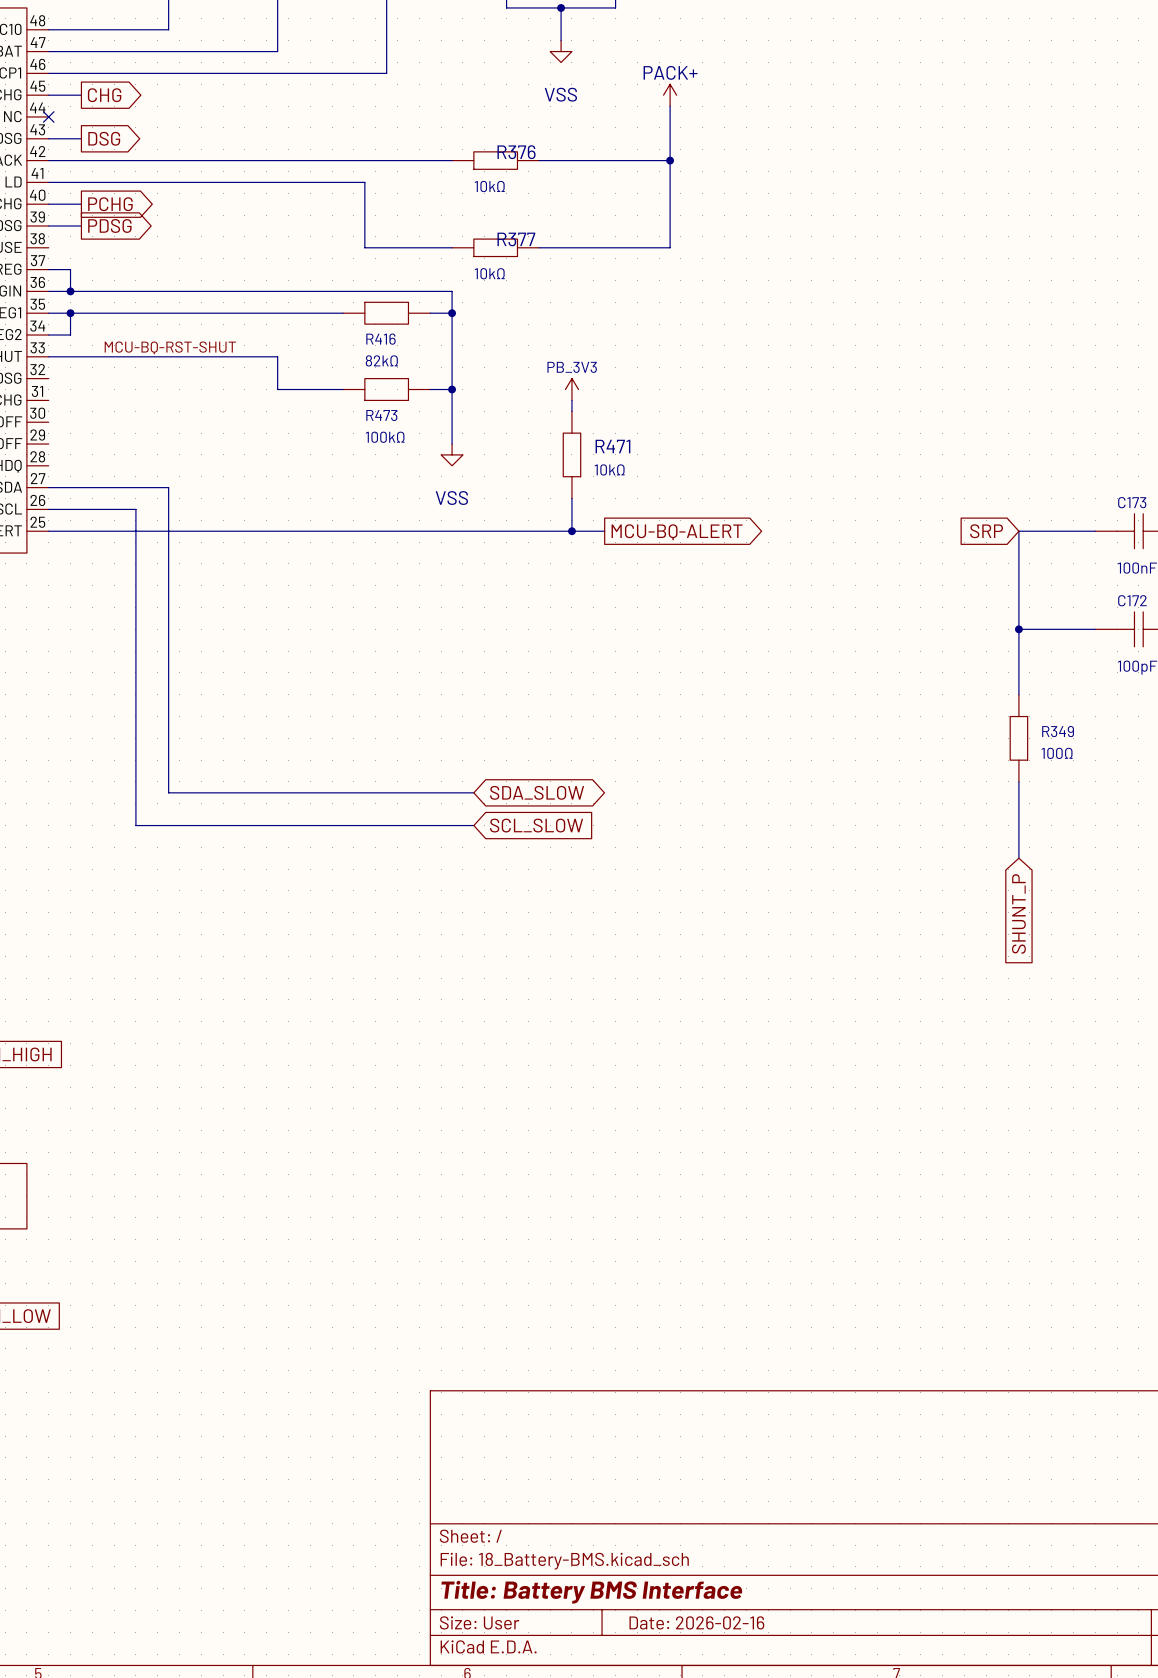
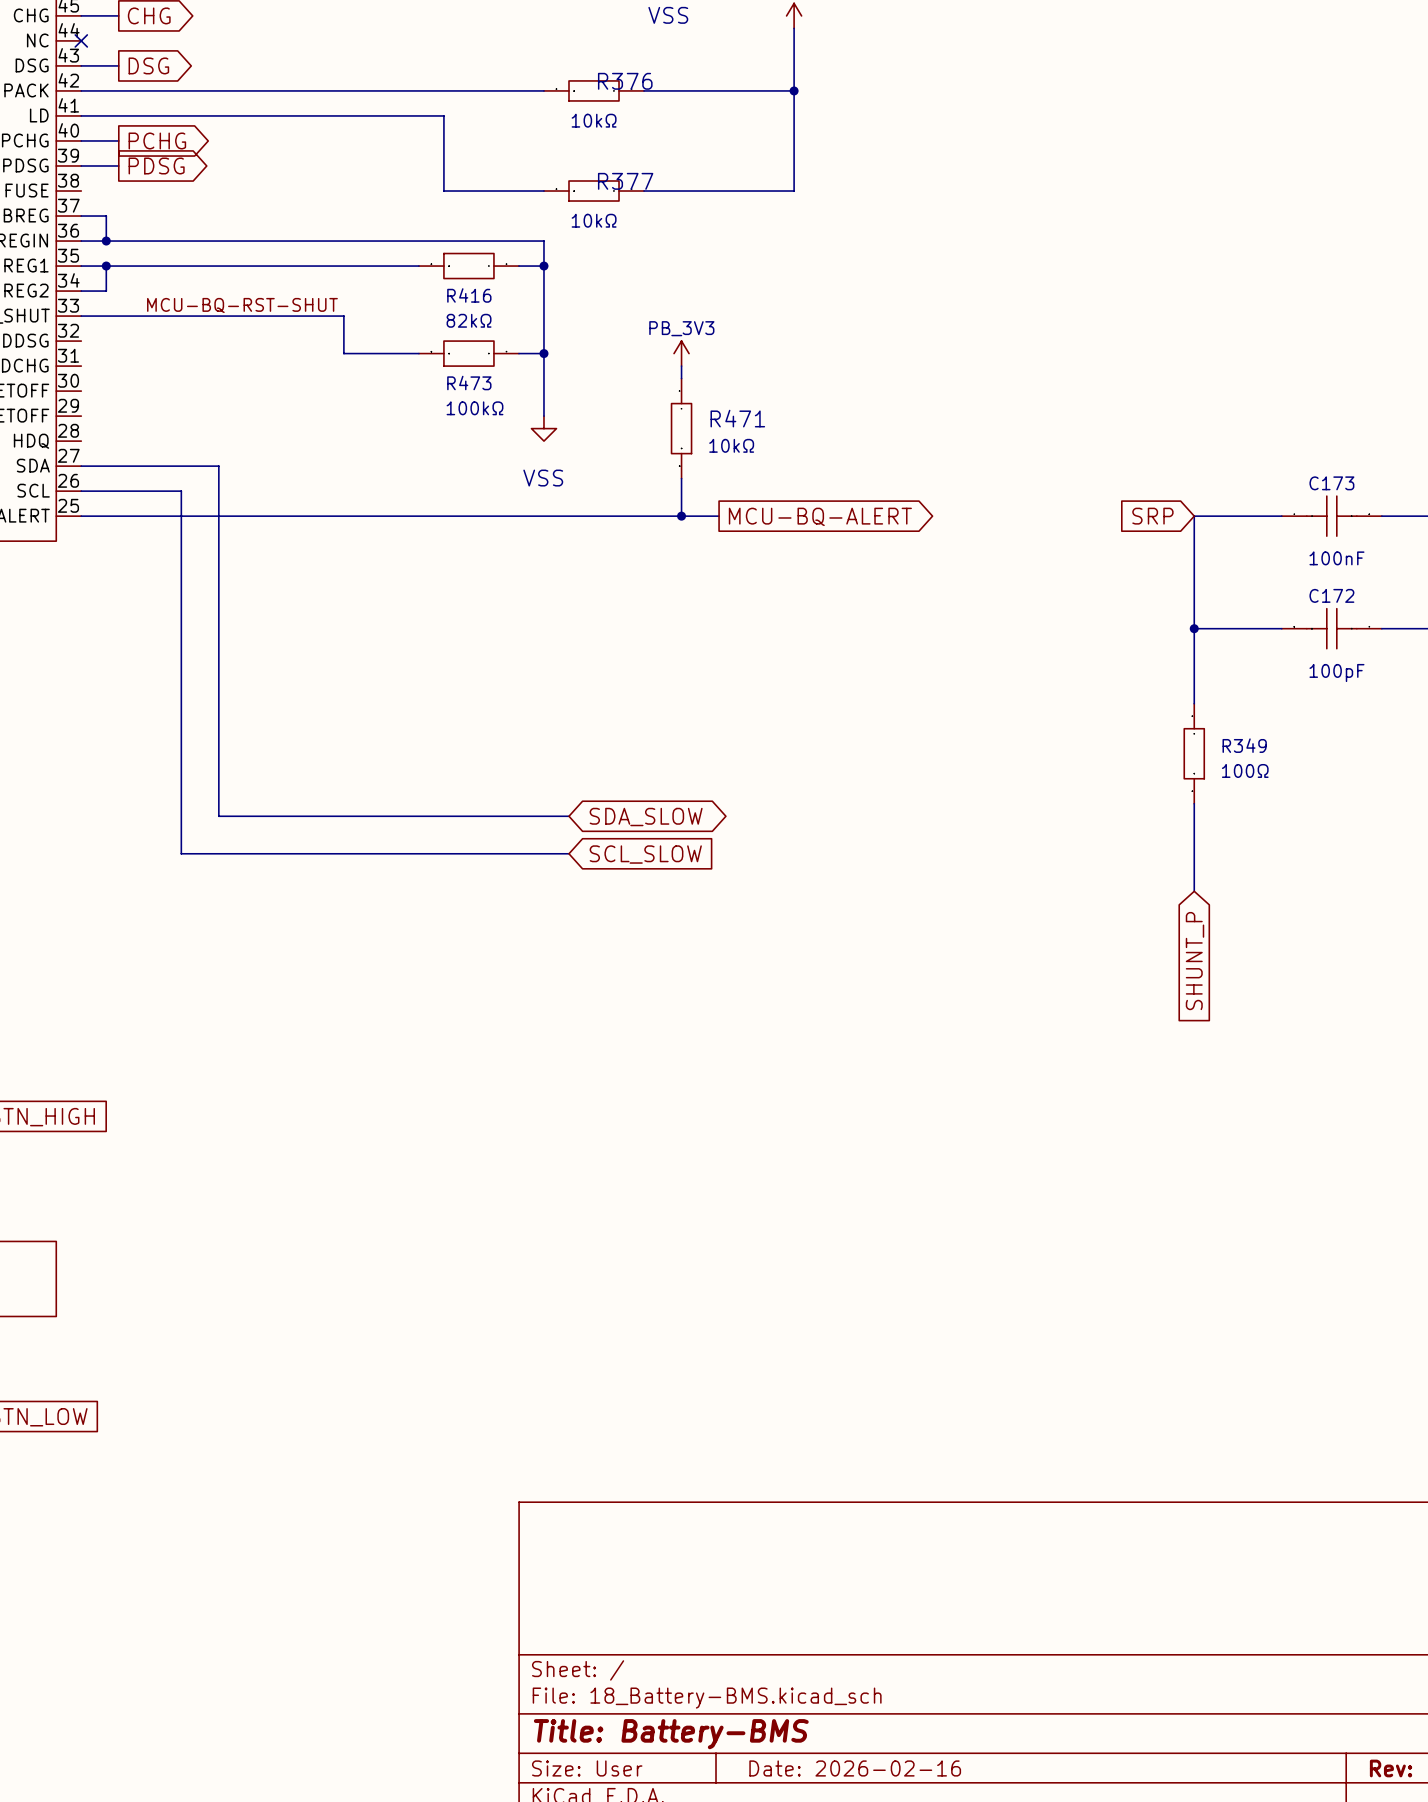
title block: Title: Battery BMS Interface (591, 1592) -> Title: Battery-BMS (671, 1734)

